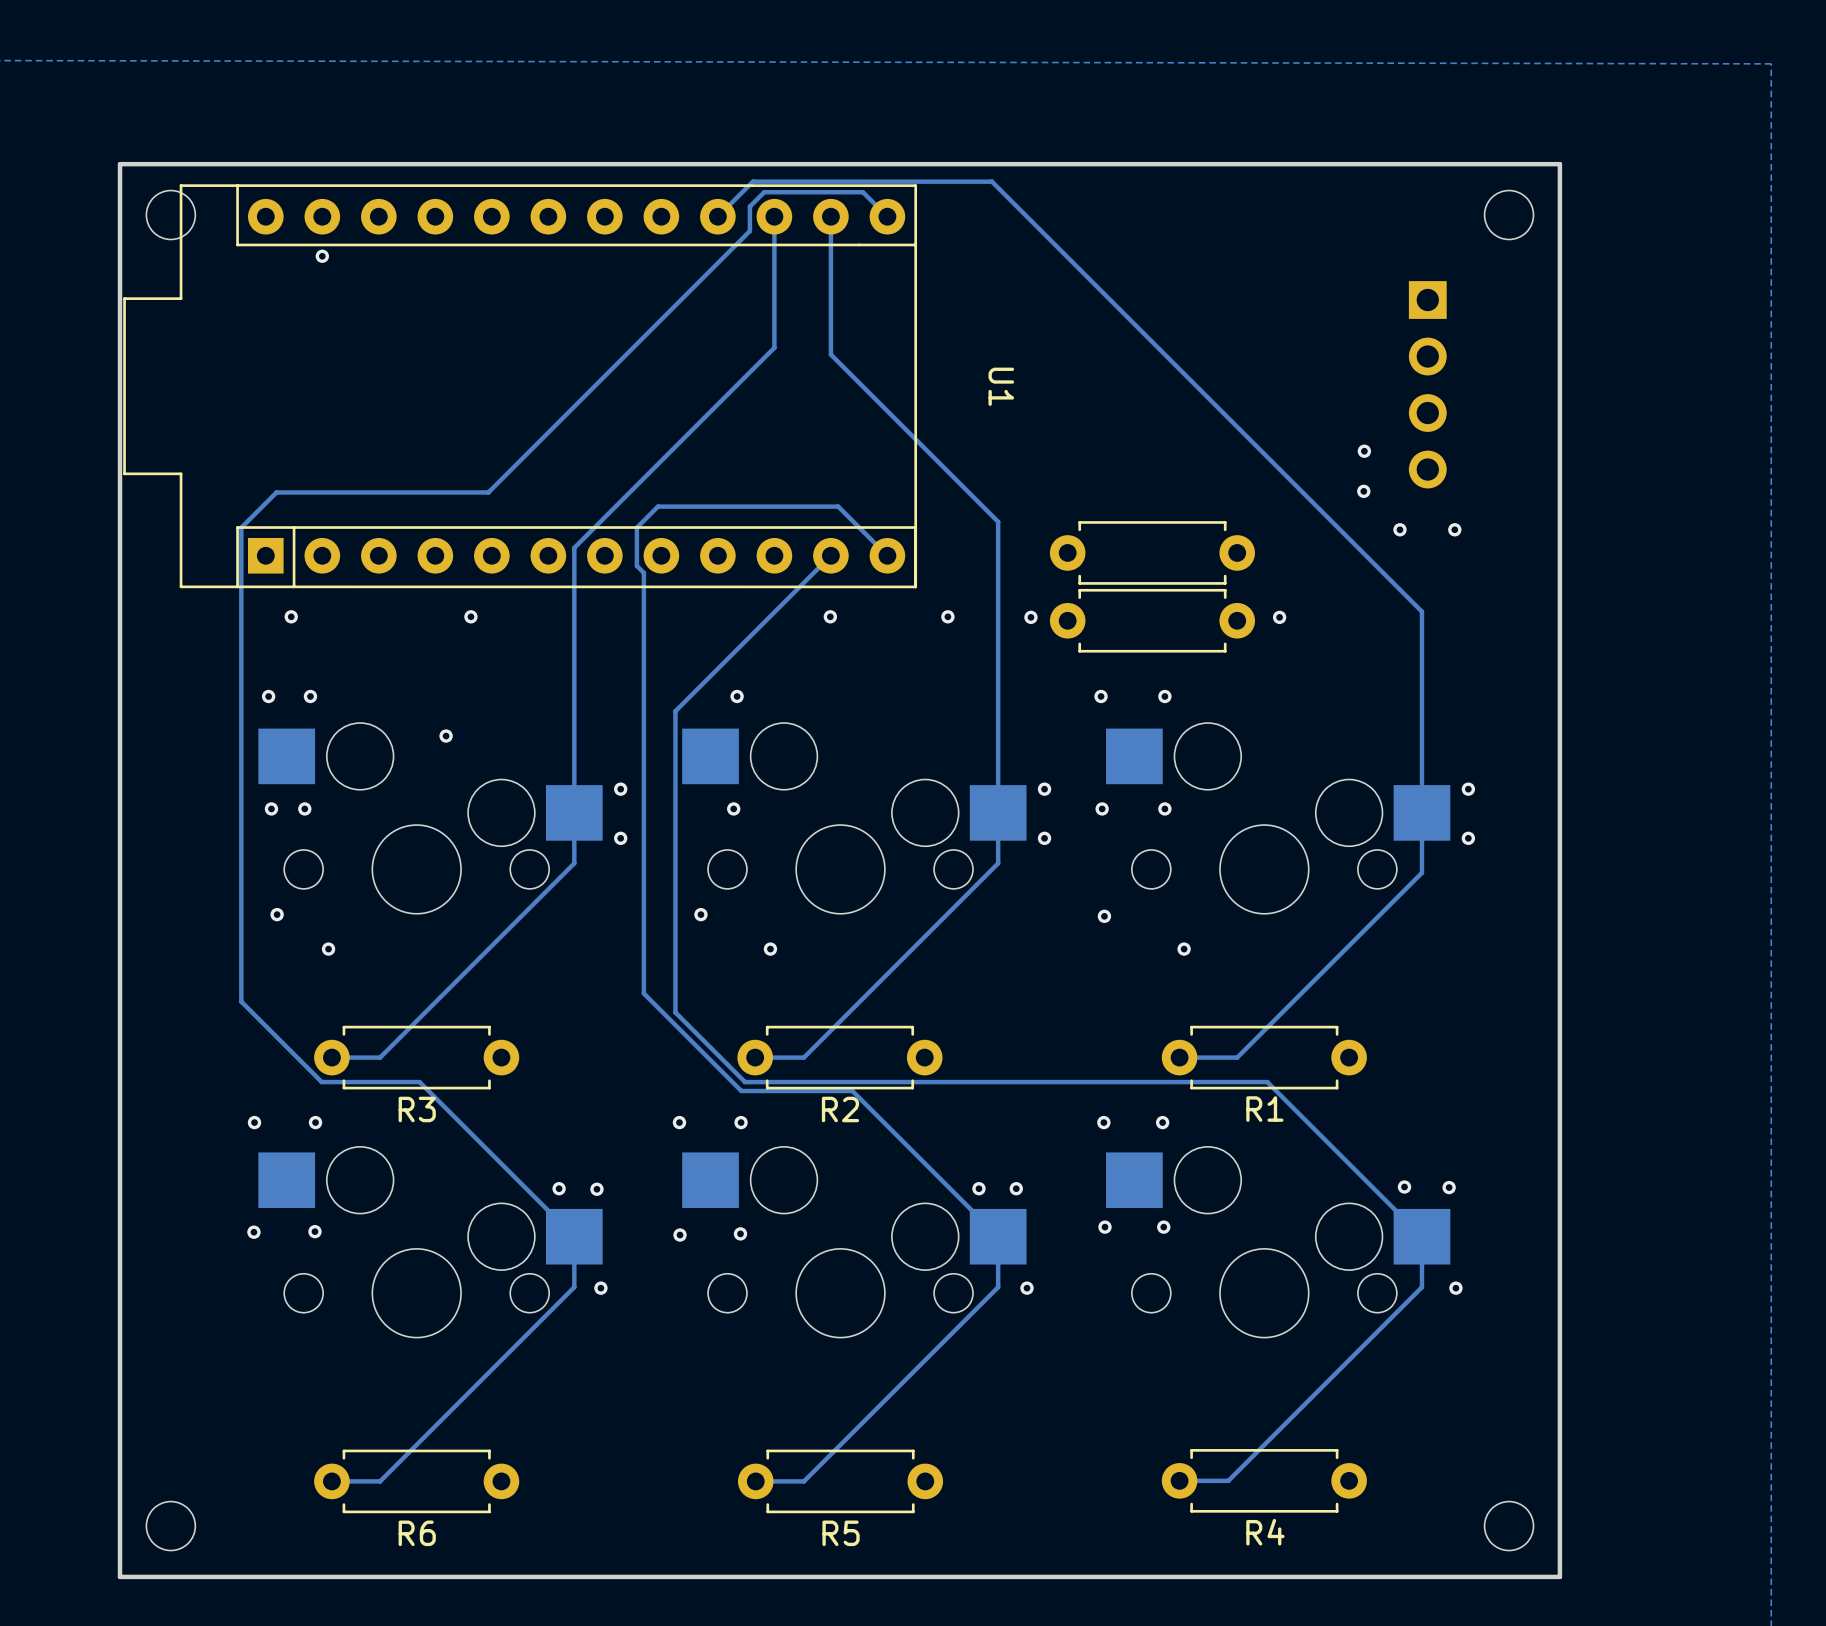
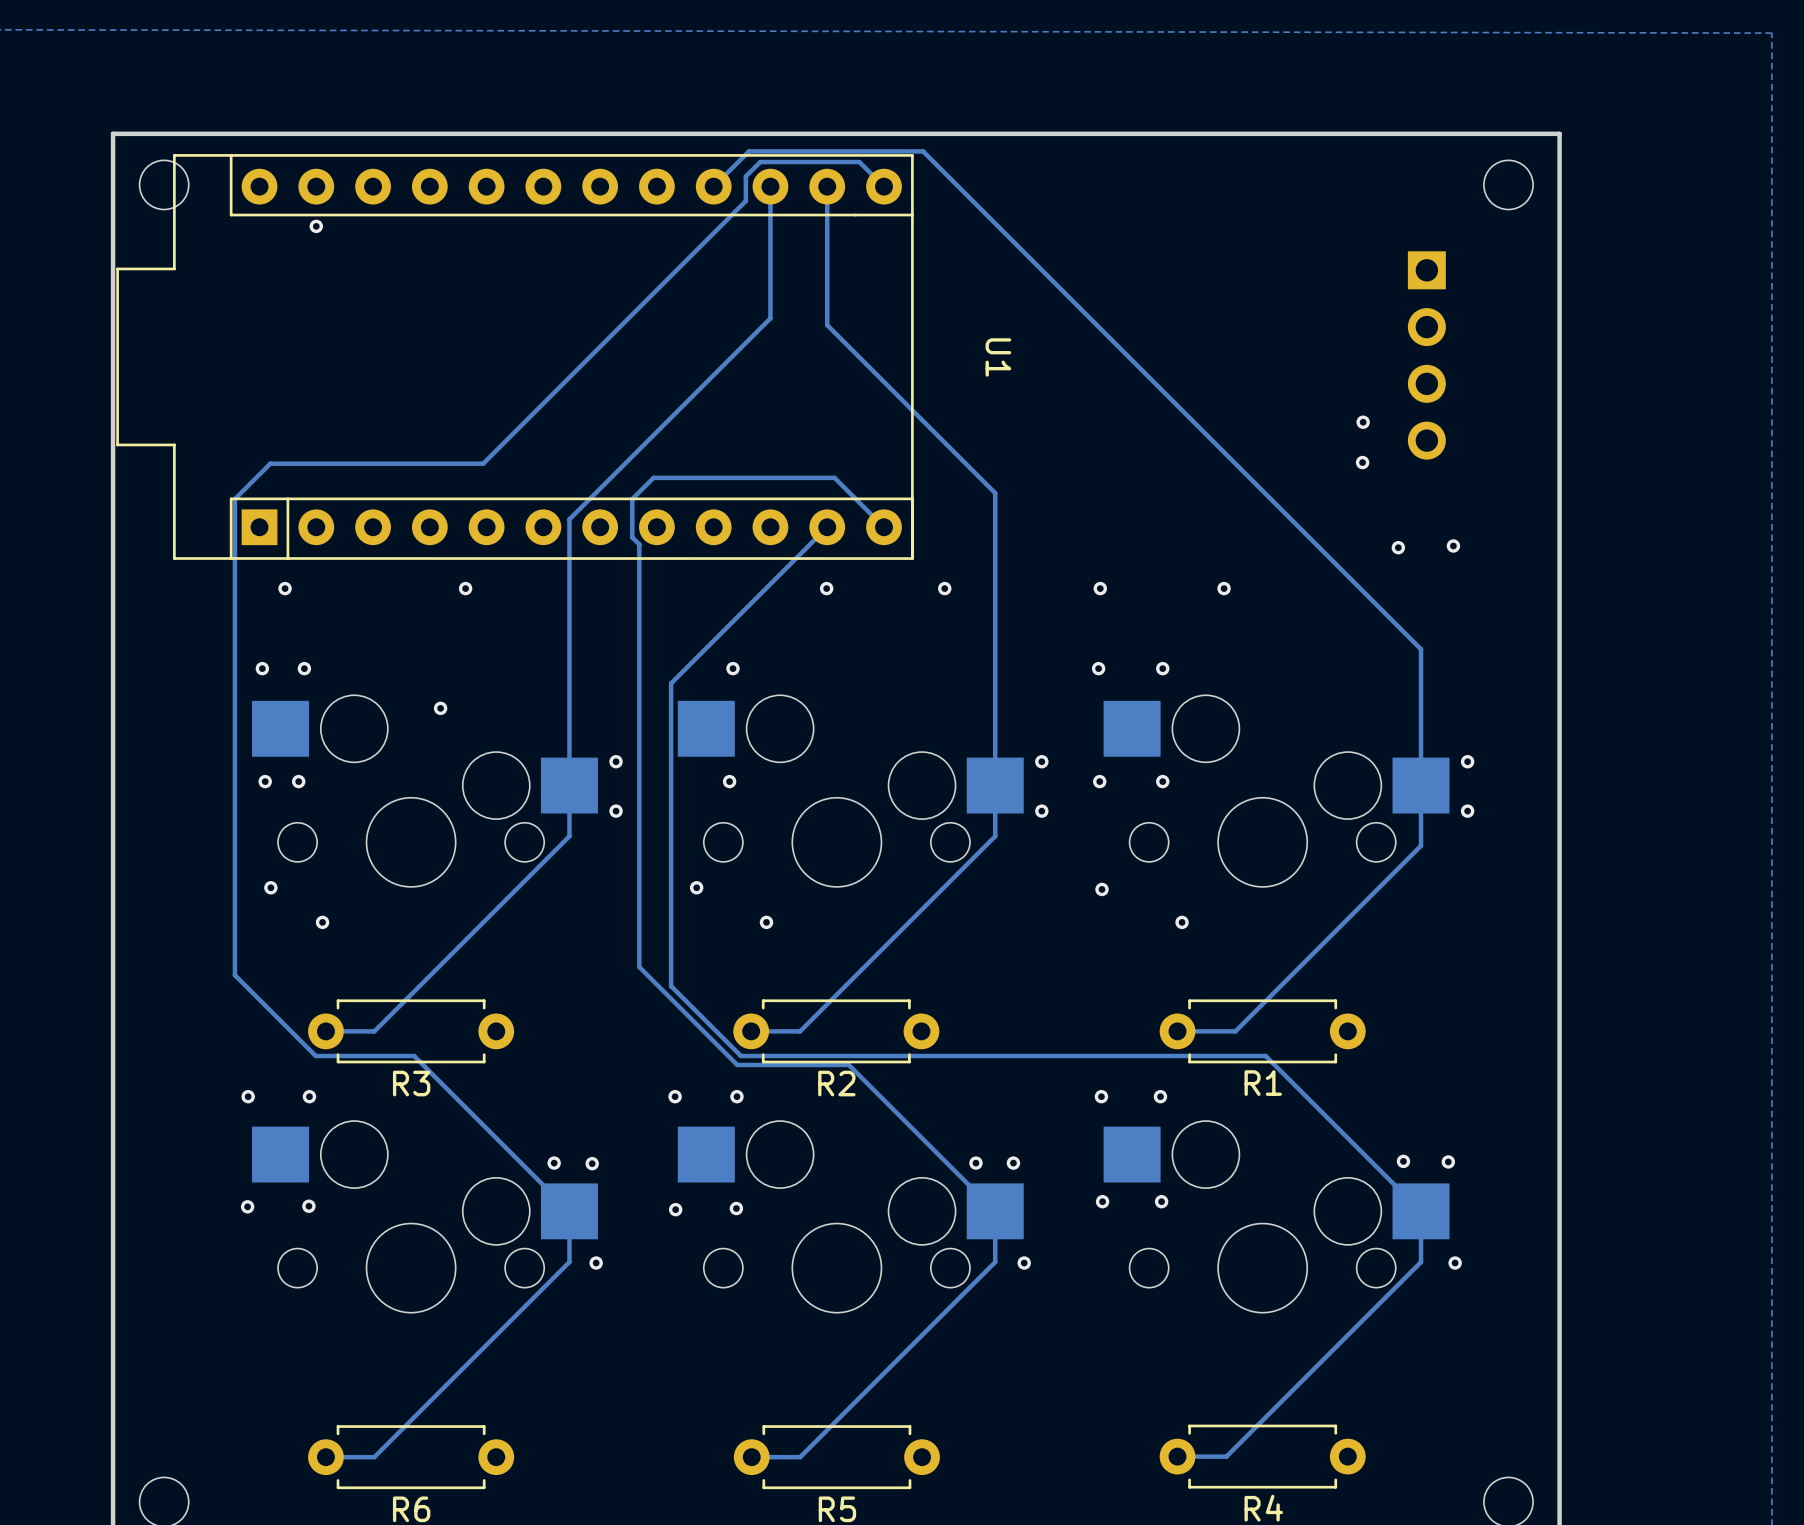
track: (926, 181) (991, 181) (1421, 611) (1421, 677) -> (923, 151) (1421, 649)
via: (1399, 529) -> none
via: (1454, 529) -> none
part: (1152, 552) -> none
via: none -> (1453, 545)
via: none -> (1398, 547)
via position: (1030, 617) -> (1100, 588)
via position: (1279, 617) -> (1224, 588)
part: (1152, 620) -> none

